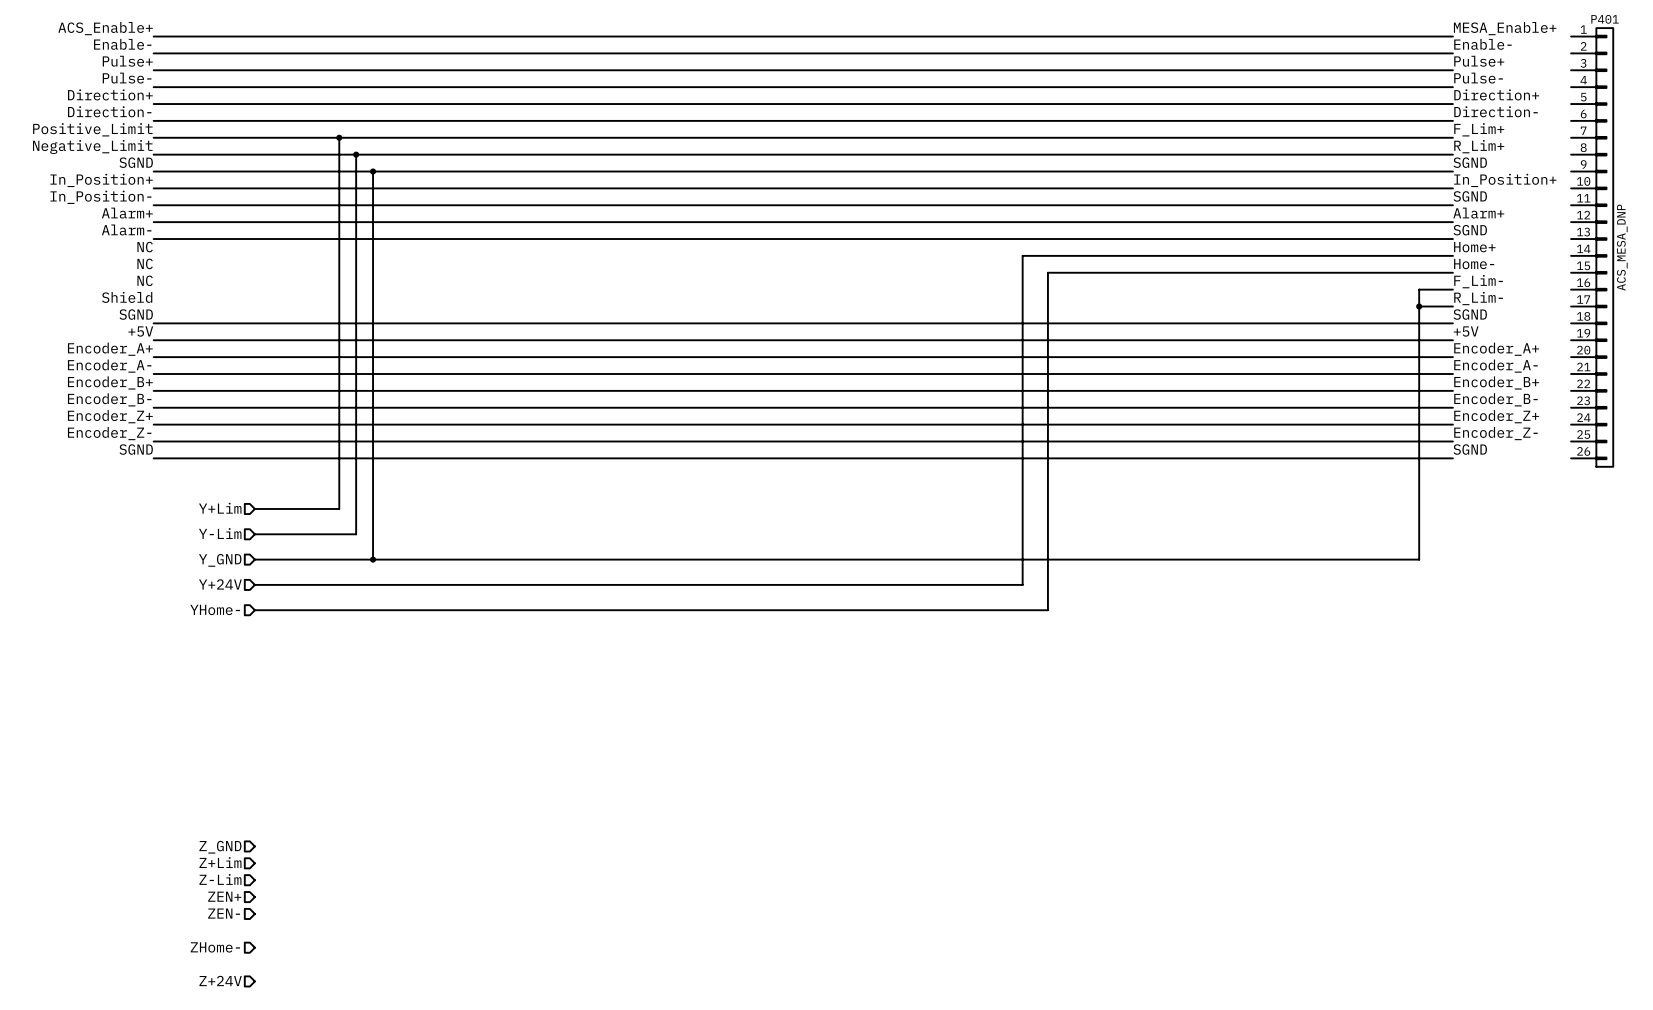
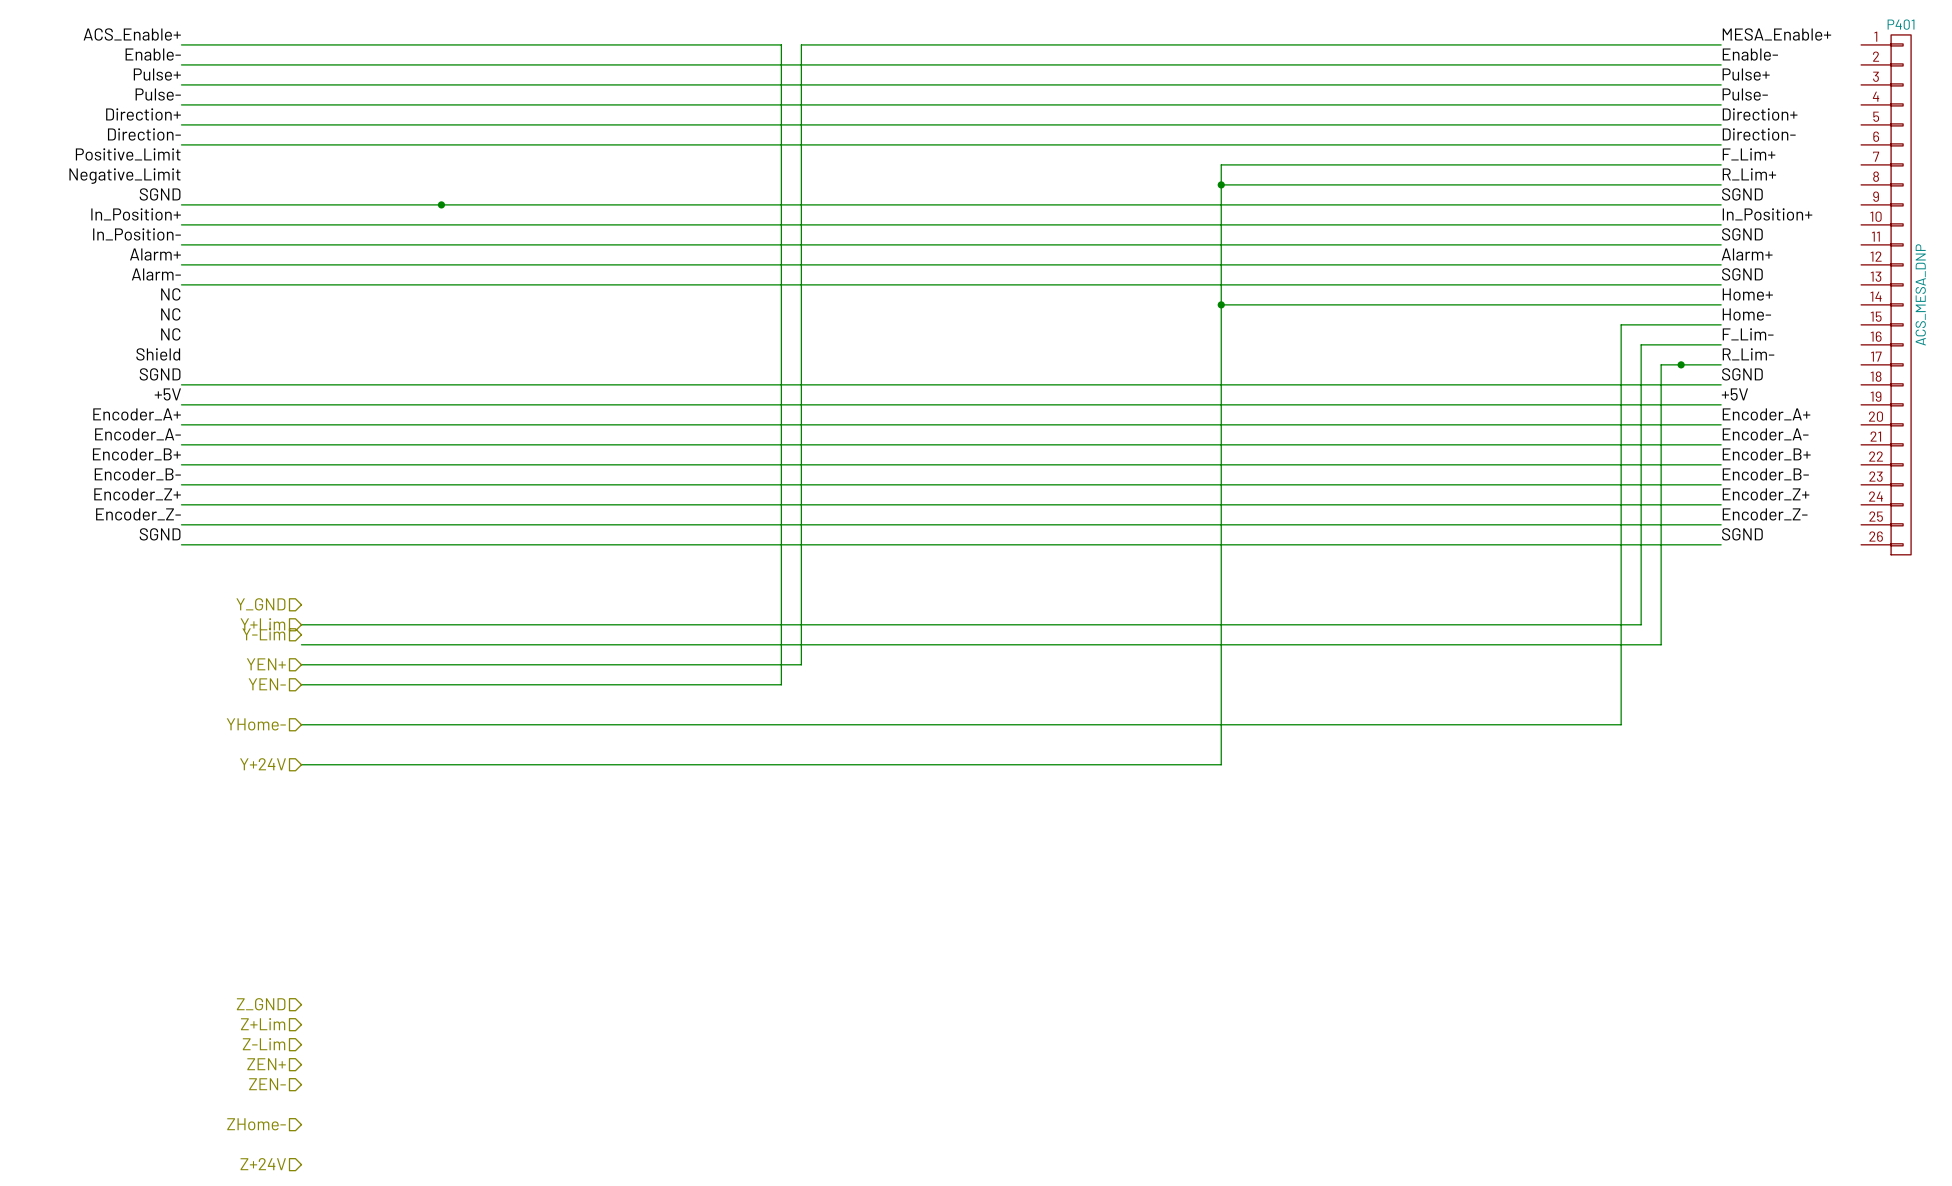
wire: (659, 36) (676, 36) -> (801, 664) (801, 44)
wire: none -> (781, 44) (781, 684) (301, 684)
wire: (153, 137) (1031, 137) -> (301, 764) (1221, 764) (1221, 164)
wire: (339, 137) (339, 508) (254, 508) -> none
junction: (339, 137) -> none
wire: (153, 154) (1031, 154) -> none
wire: (356, 154) (356, 534) (254, 534) -> none
junction: (356, 154) -> none
junction: none -> (1221, 184)
wire: (373, 171) (373, 559) -> none
wire: (1031, 255) (1022, 255) (1022, 584) (254, 584) -> none
junction: none -> (1221, 304)
wire: (1368, 272) (1047, 272) (1047, 610) -> (1621, 324) (1621, 724) (1241, 724)
wire: (1419, 289) (1419, 559) (676, 559) -> (1681, 344) (1641, 344) (1641, 624) (301, 624)
wire: none -> (1681, 364) (1661, 364) (1661, 644) (301, 644)
hierarchical label: Y+Lim (220, 508) -> Y_GND (260, 604)
hierarchical label: none -> Y+Lim (262, 624)
junction: (373, 559) -> none
hierarchical label: Y_GND (220, 560) -> YEN+ (266, 664)
hierarchical label: none -> YEN- (267, 684)
hierarchical label position: Y+24V (220, 584) -> Y+24V (263, 764)

